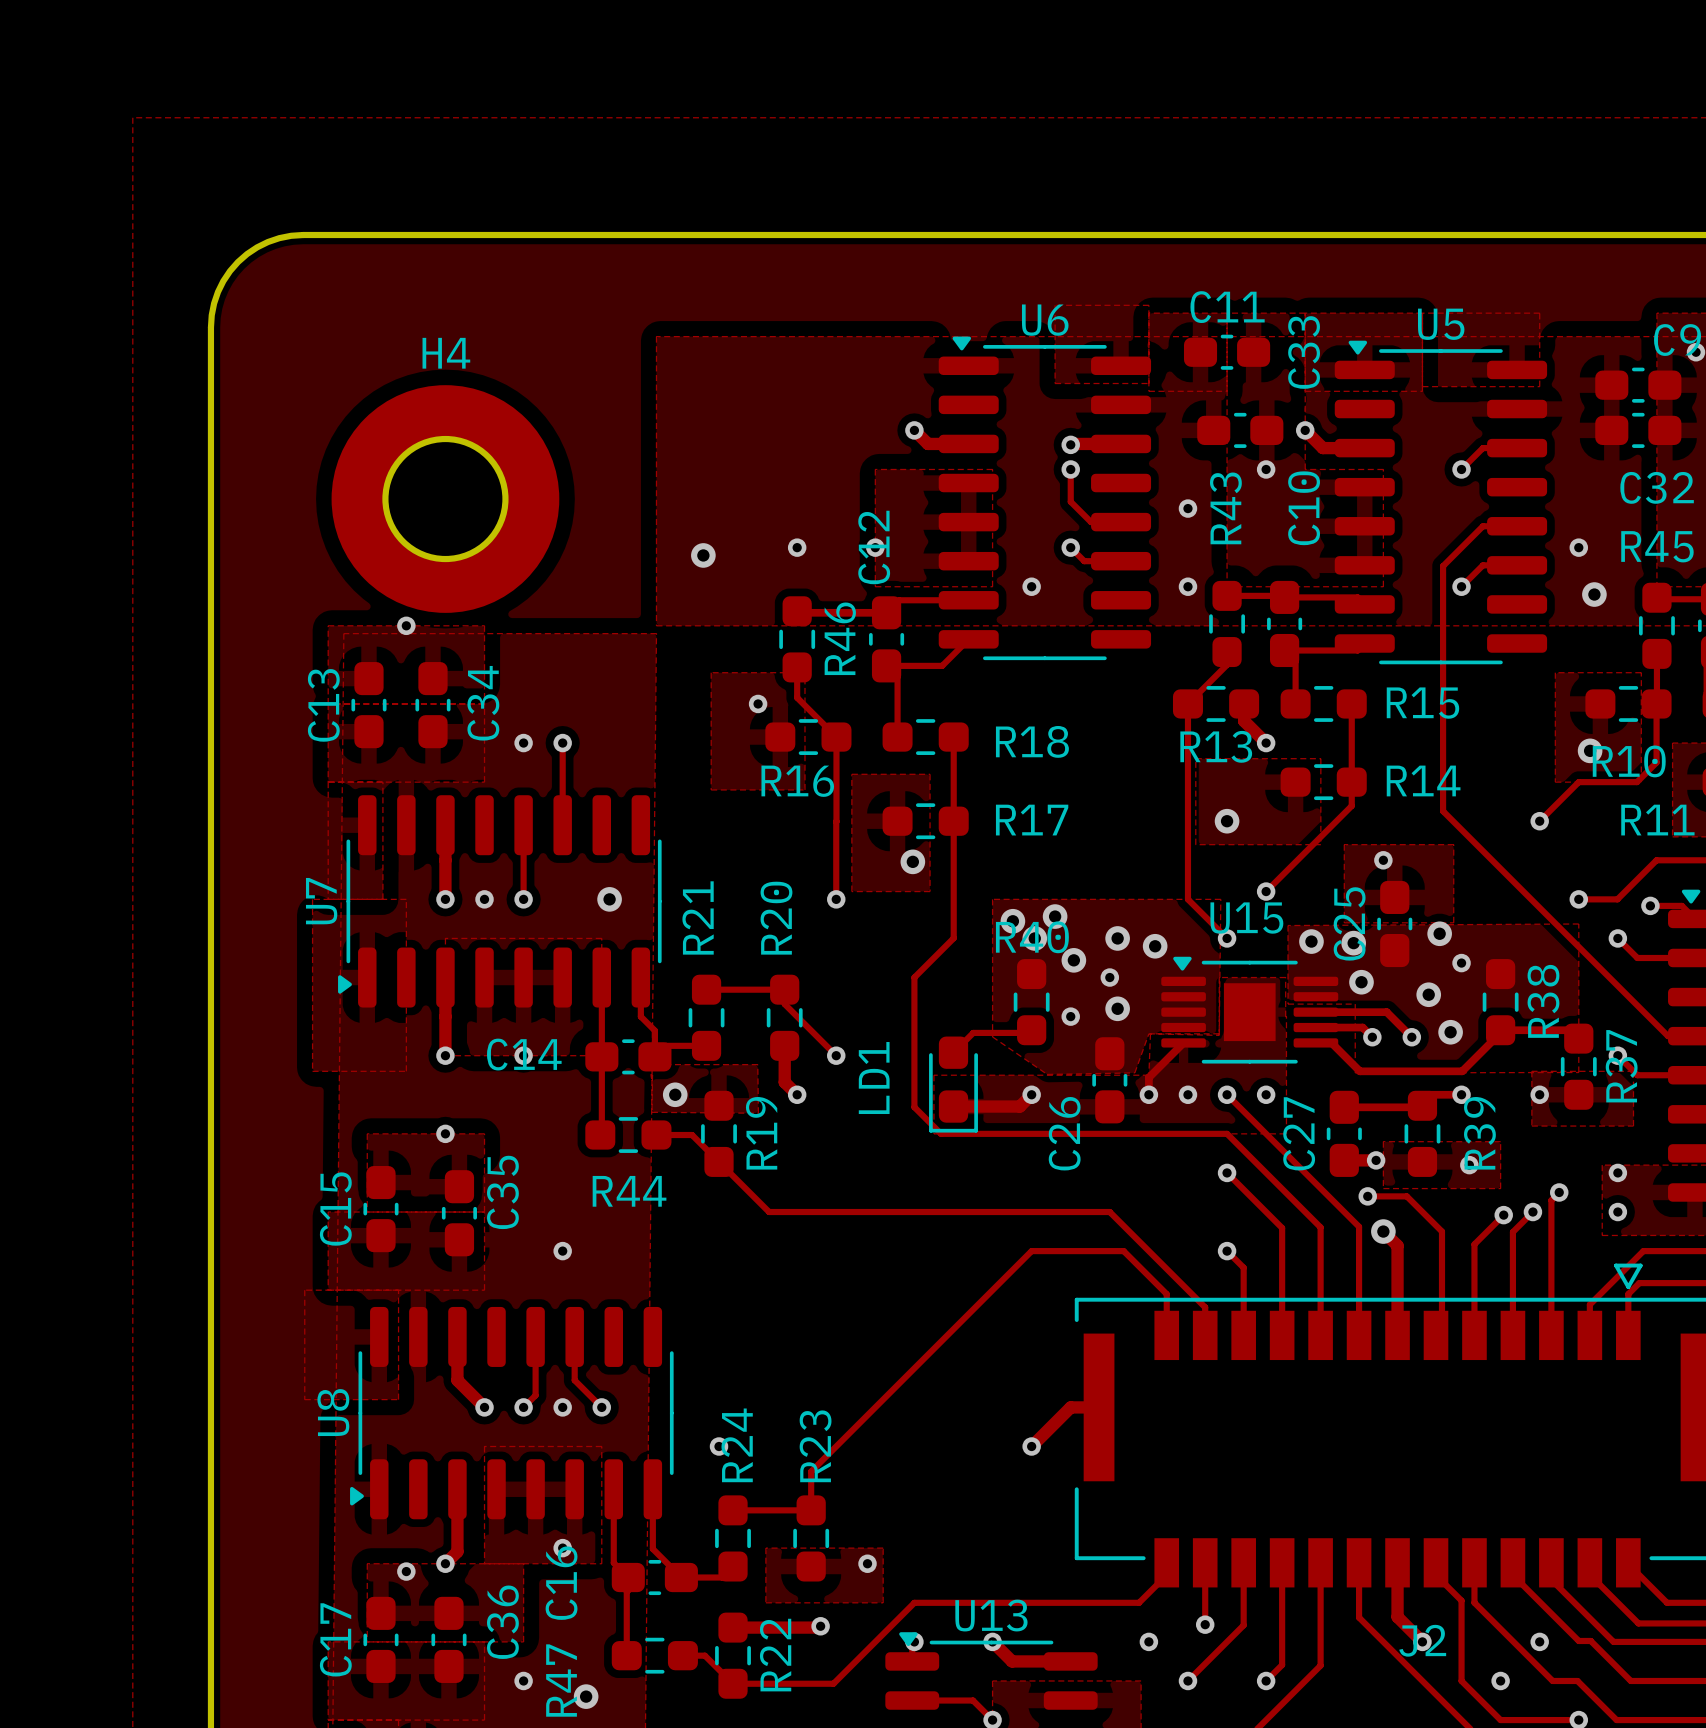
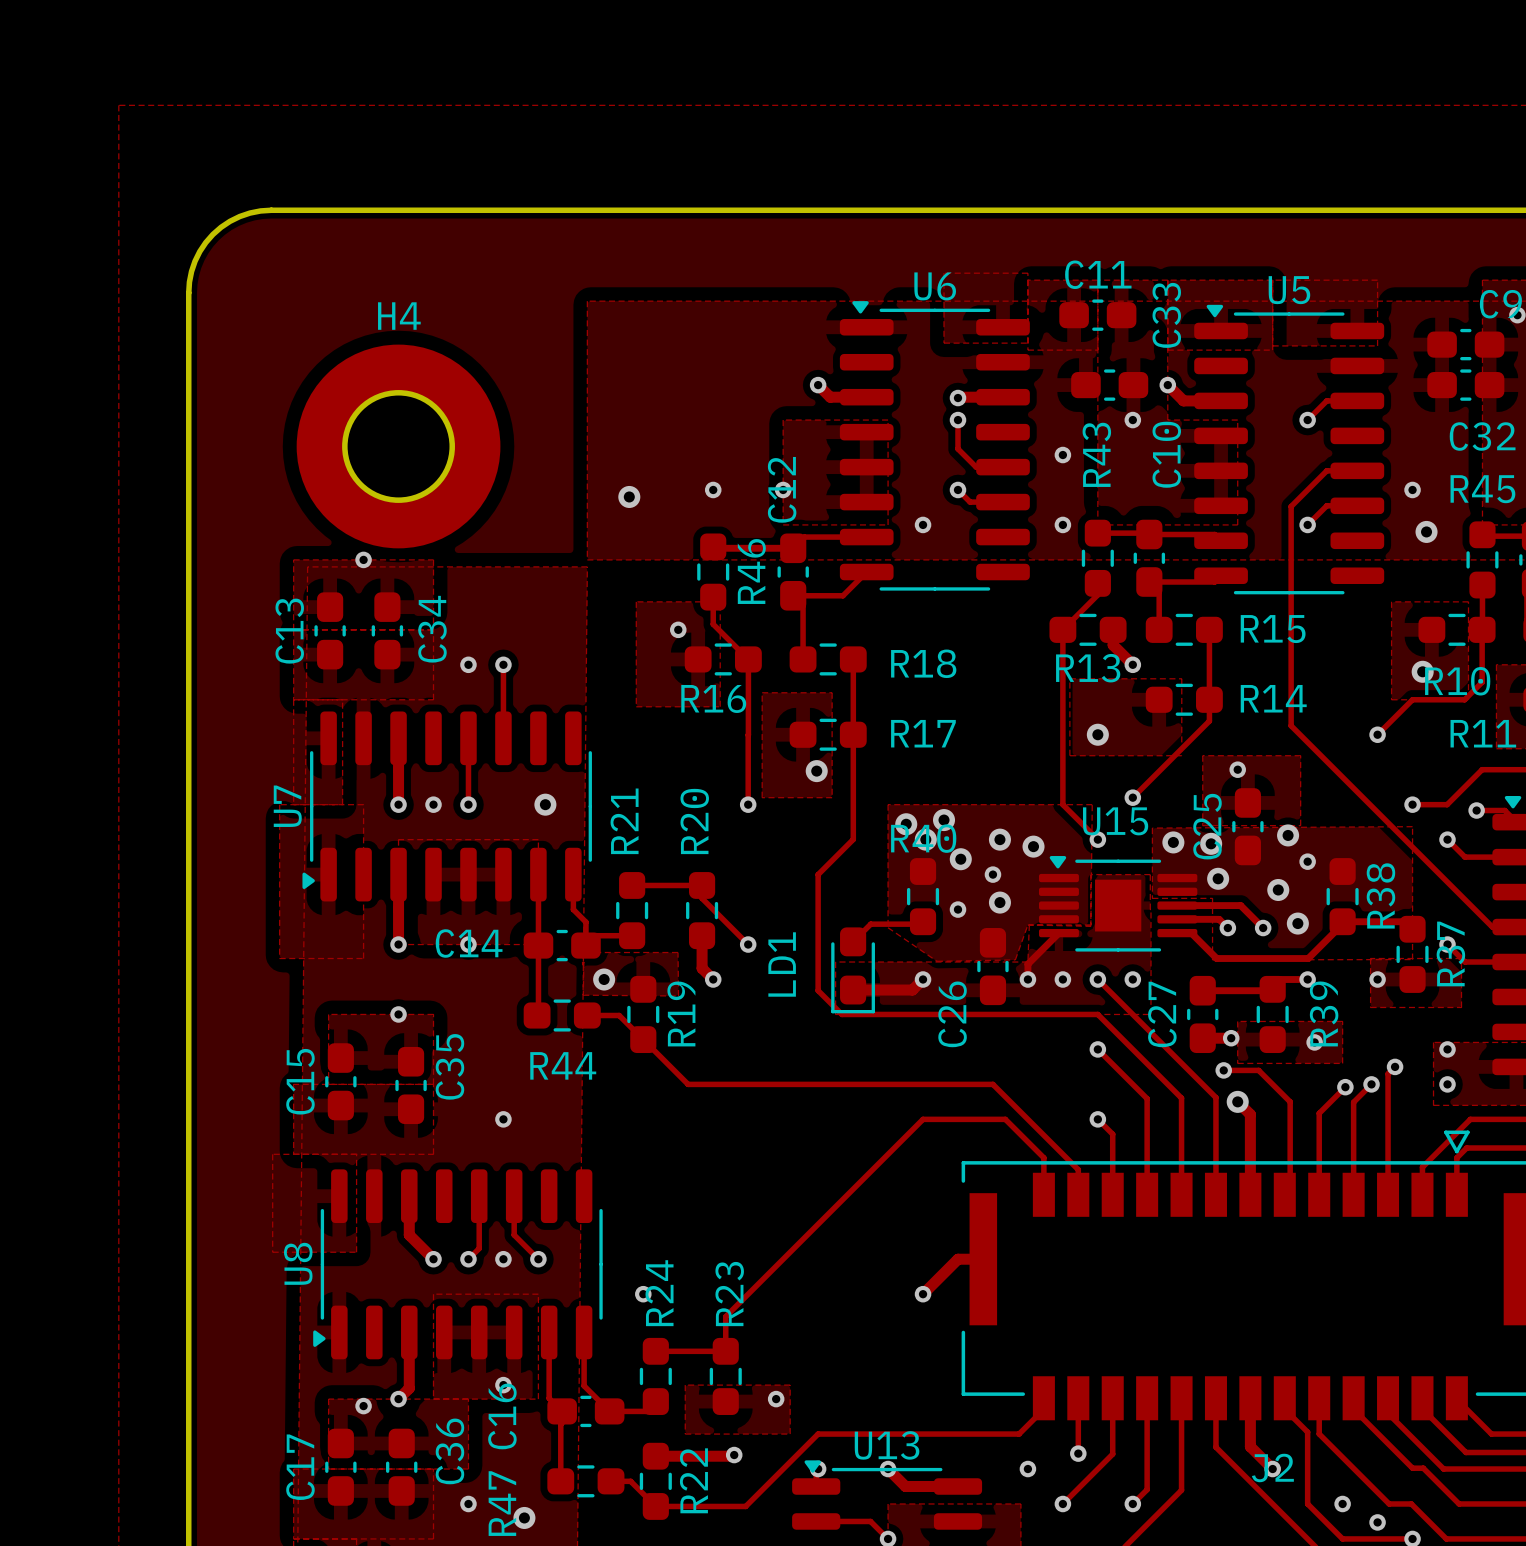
via position: (1539, 1641) -> (1377, 1522)

